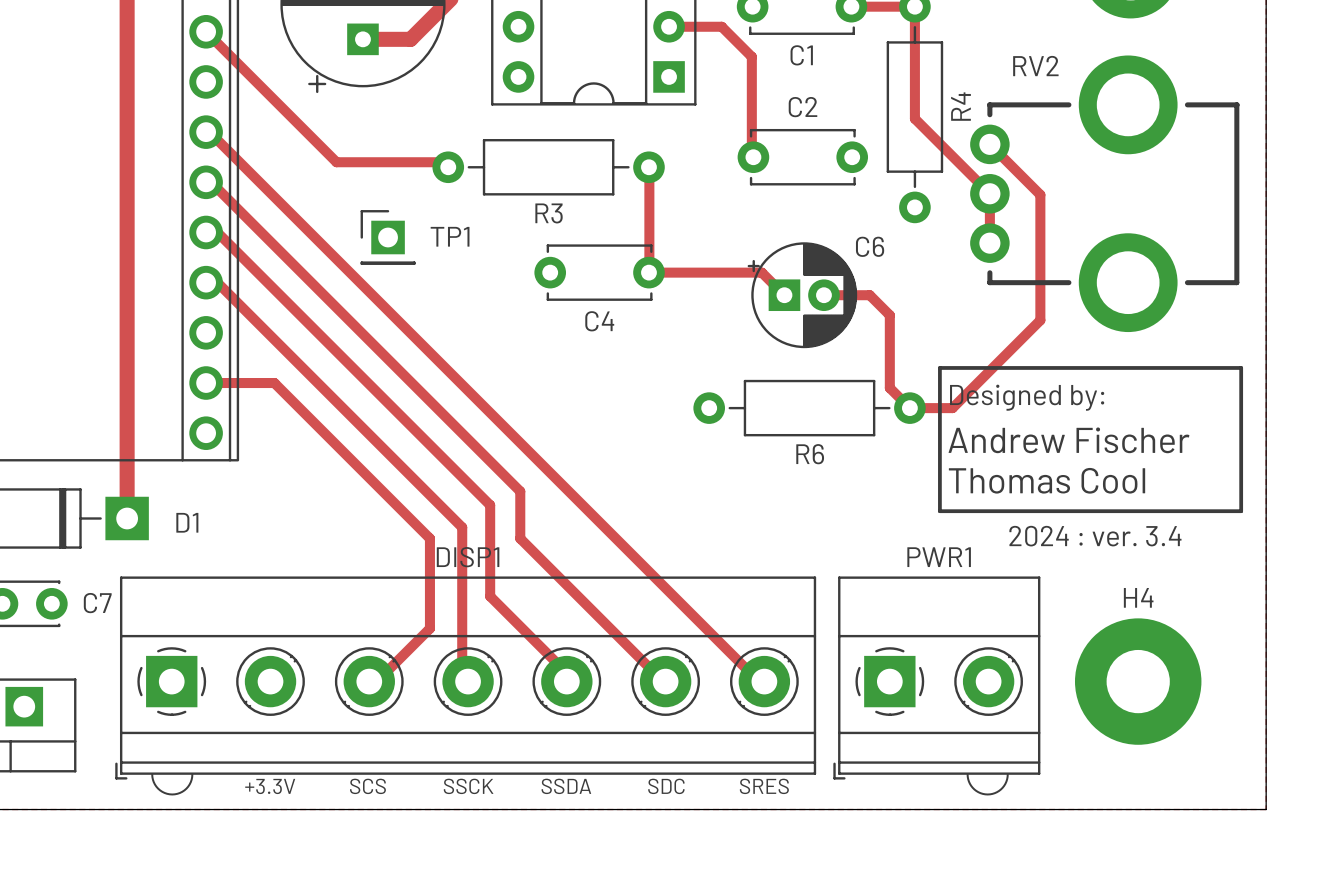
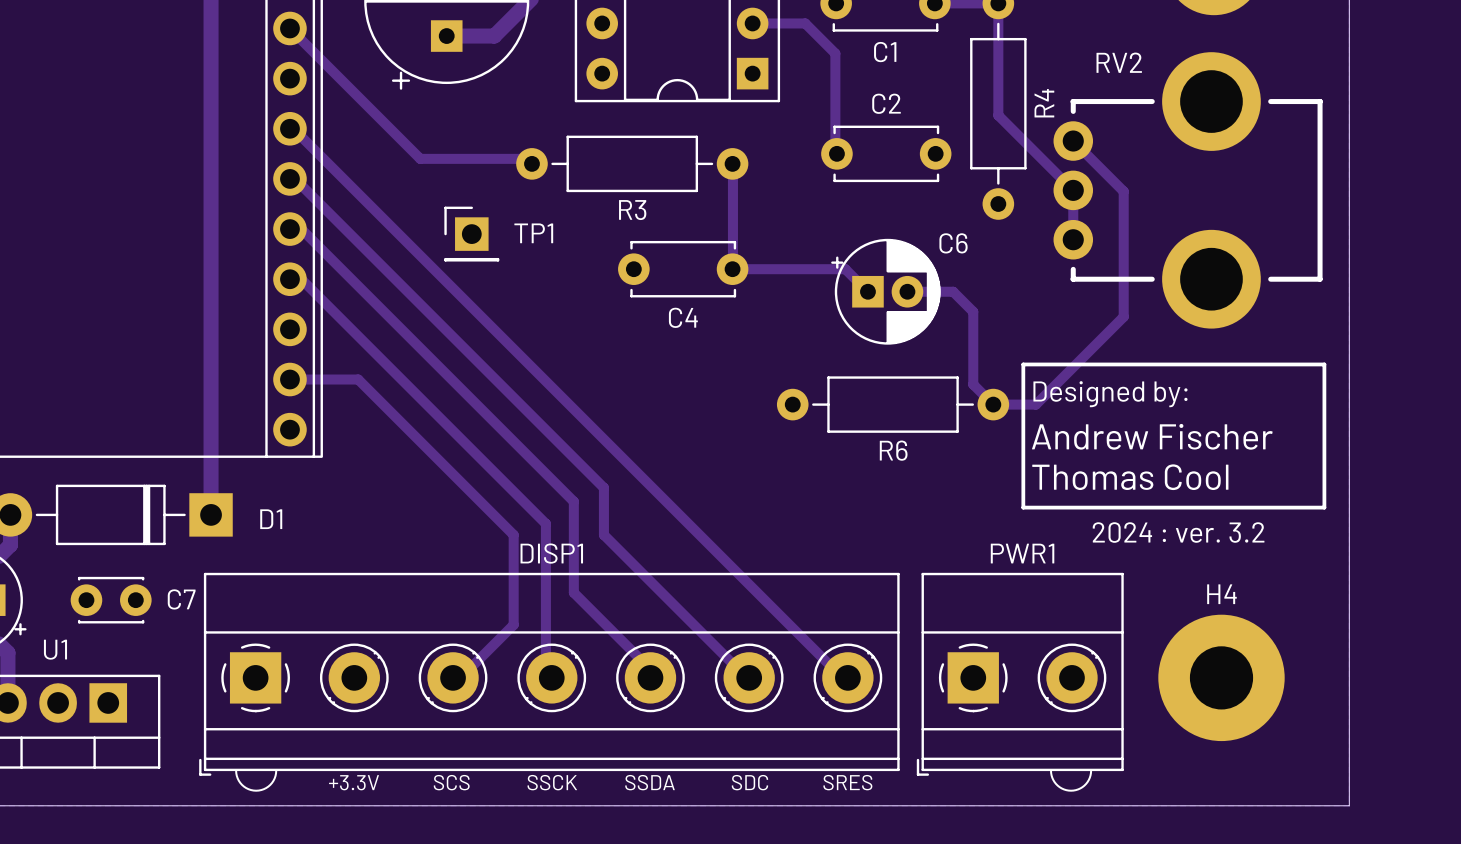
text: 2024 : ver. 3.4 (1095, 536) -> 2024 : ver. 3.2 (1178, 532)

